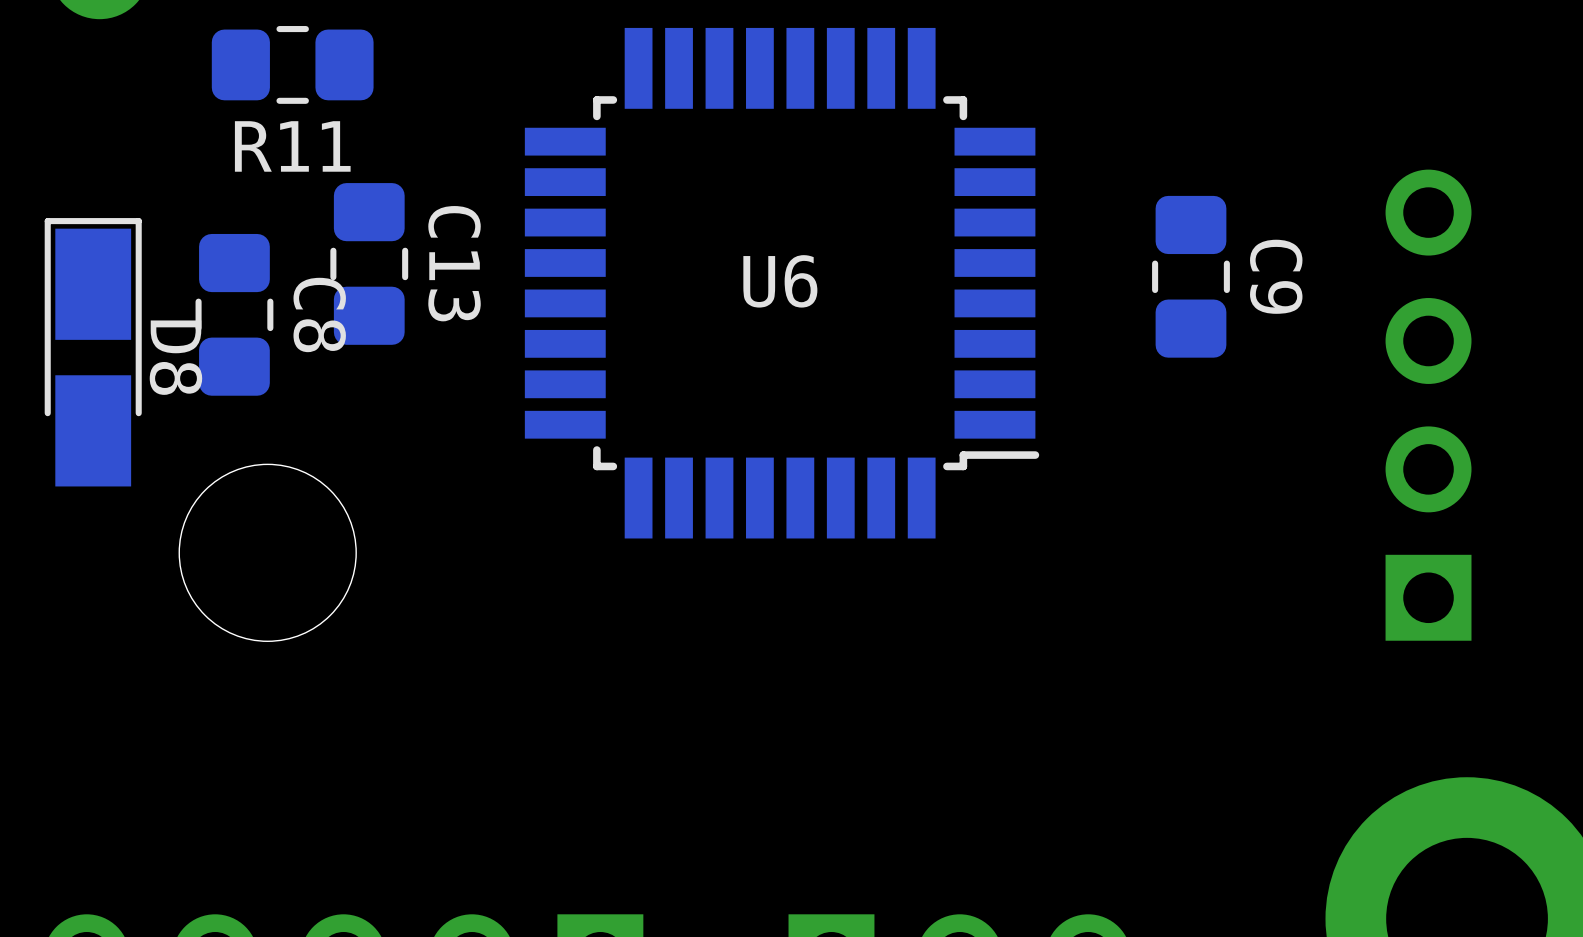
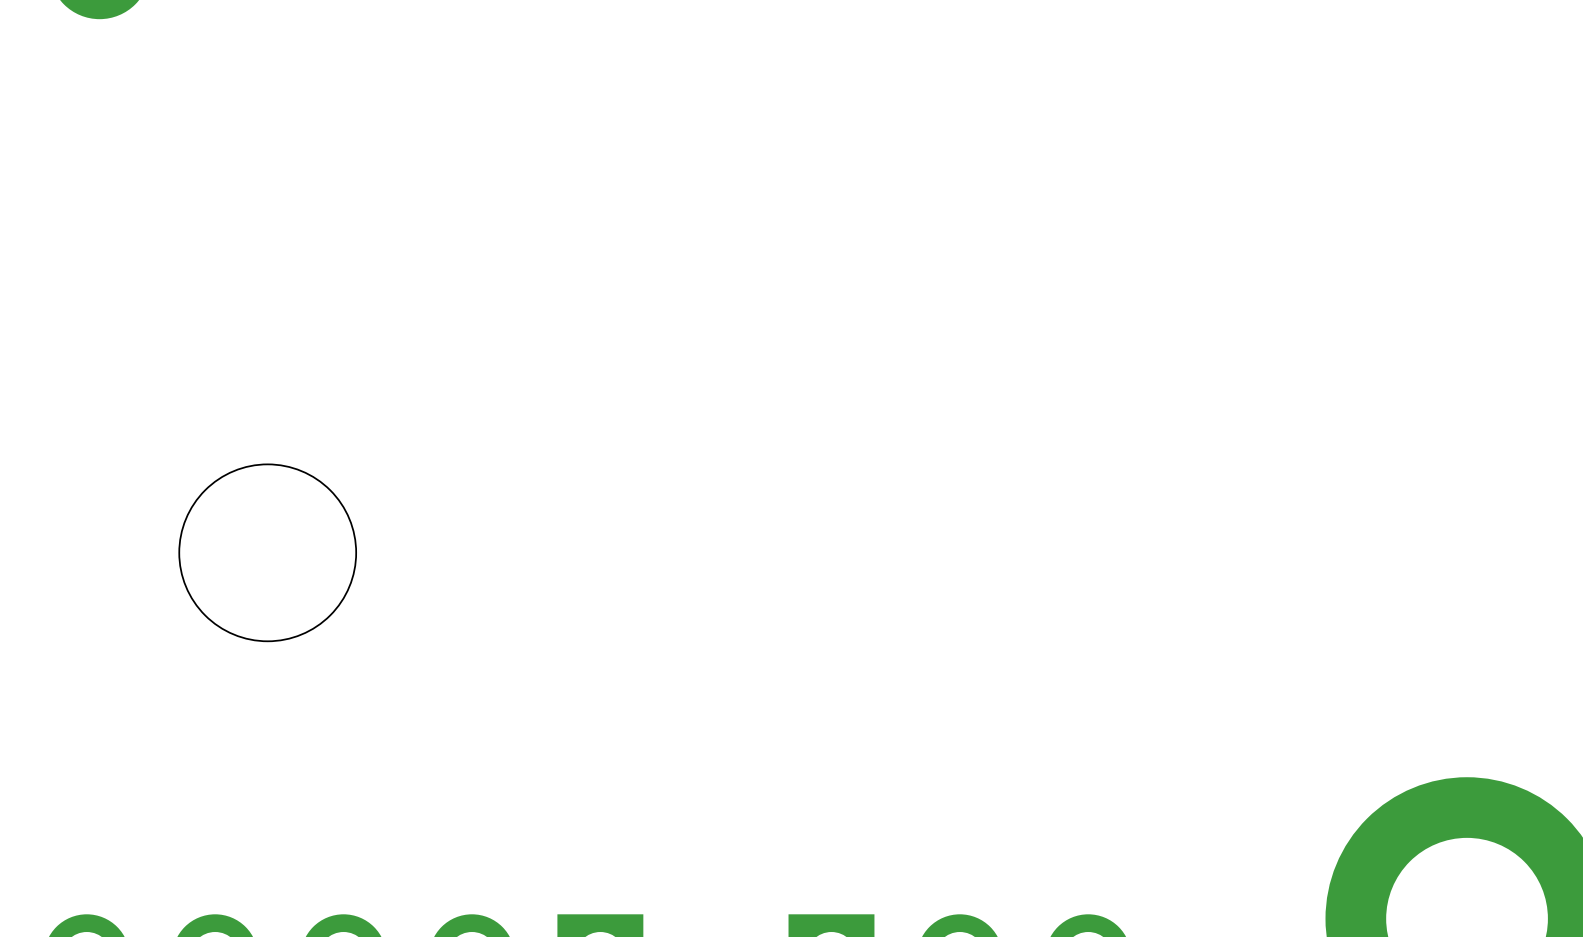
R11: (292, 64) -> none
C13: (369, 263) -> none
C9: (1190, 276) -> none
U6: (782, 283) -> none
C8: (234, 314) -> none
D8: (93, 352) -> none
part: (1428, 405) -> none

